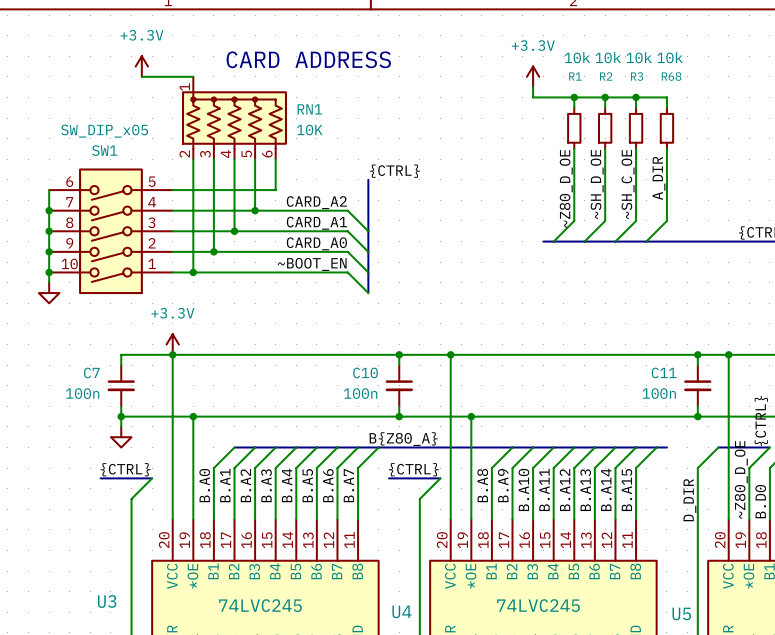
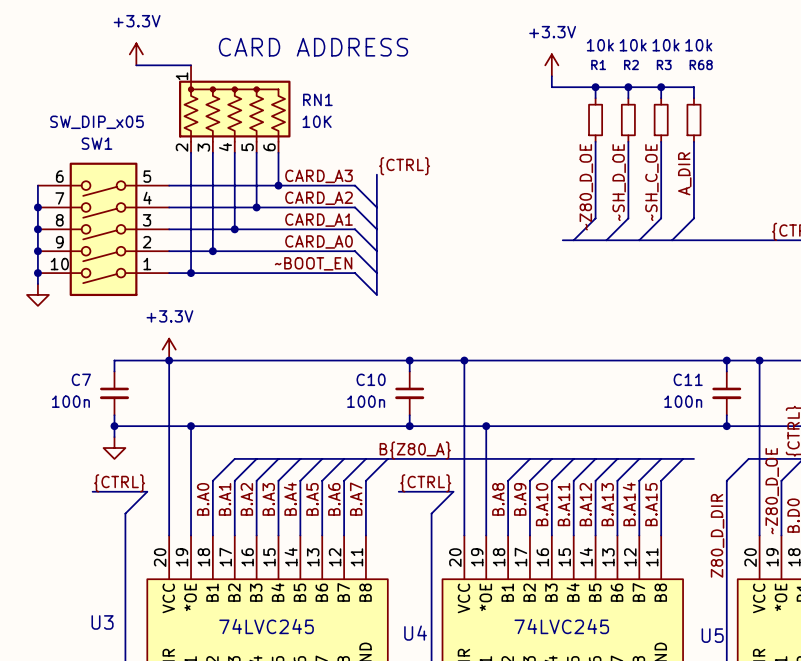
label: none -> CARD_A3 (319, 176)
wire: none -> (278, 185) (355, 185) (376, 207)
junction: none -> (278, 185)
label: D_DIR (689, 500) -> Z80_D_DIR (717, 535)

